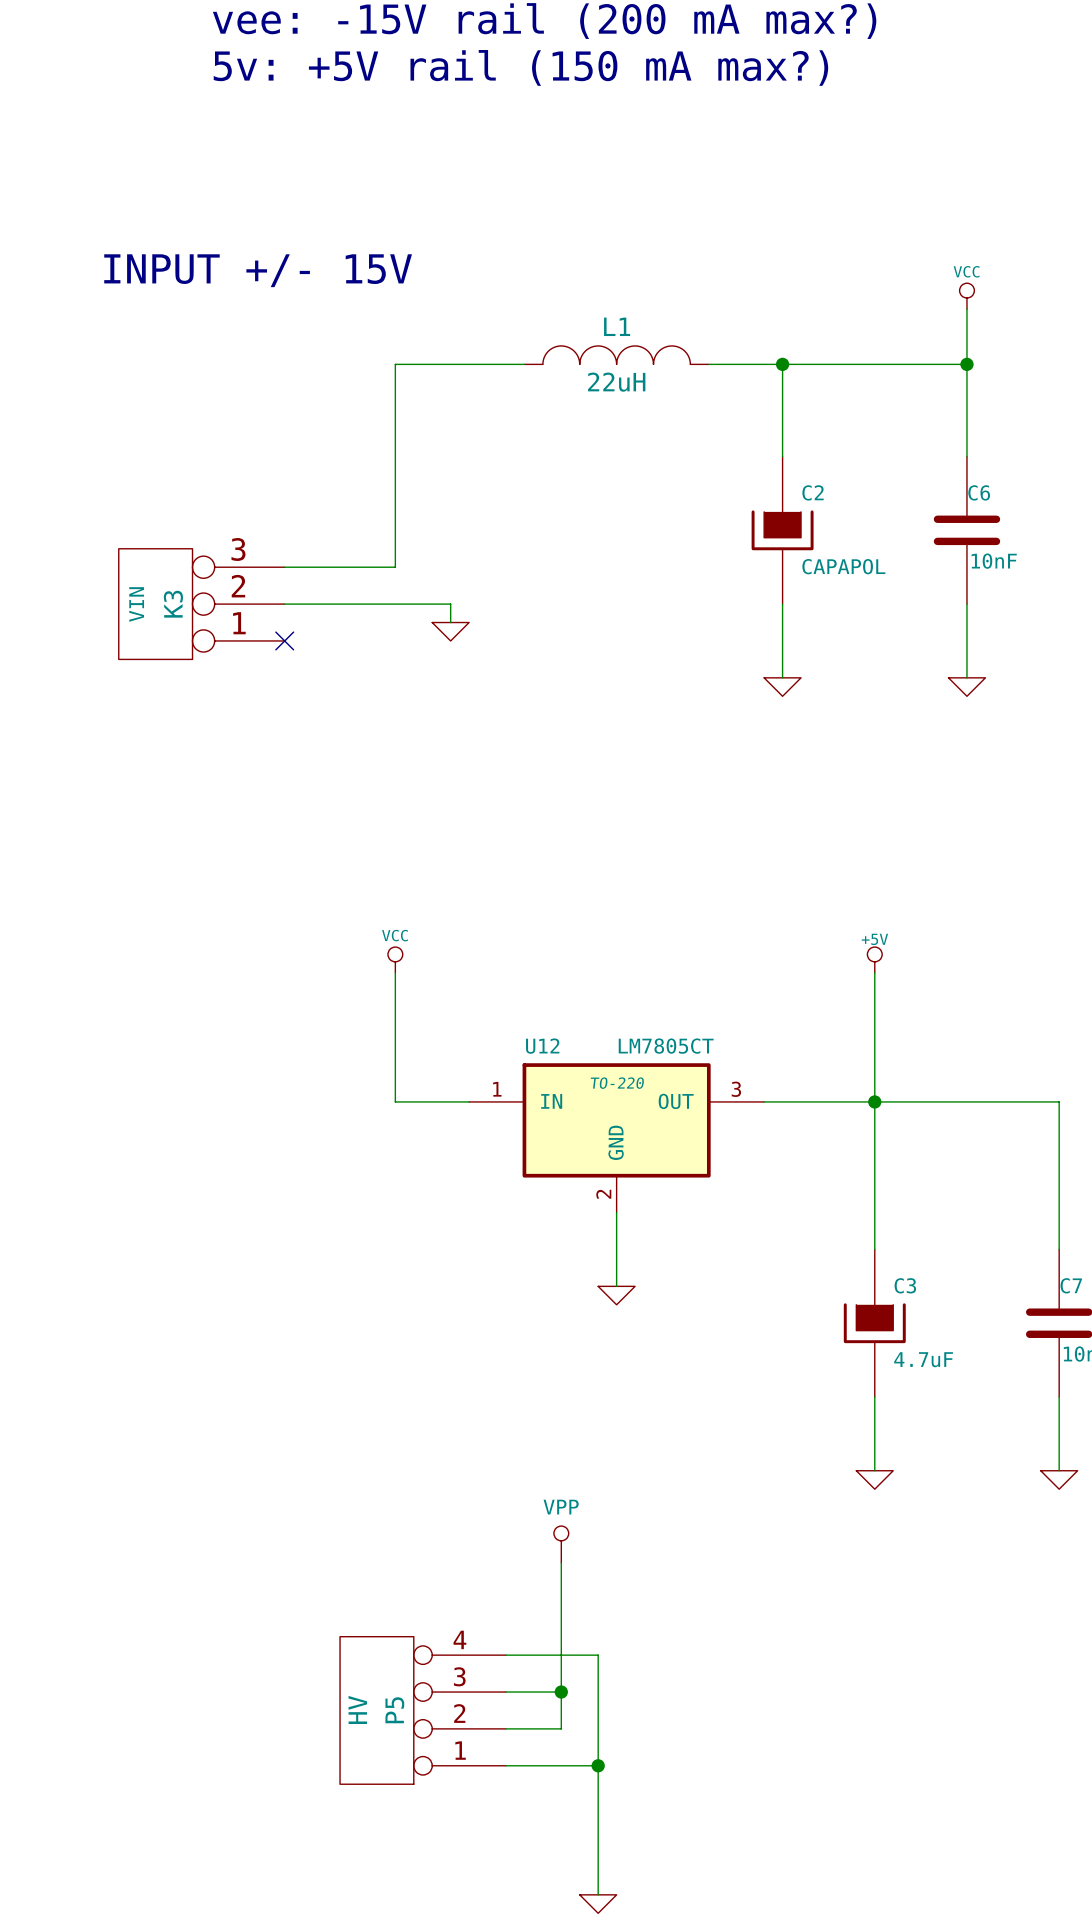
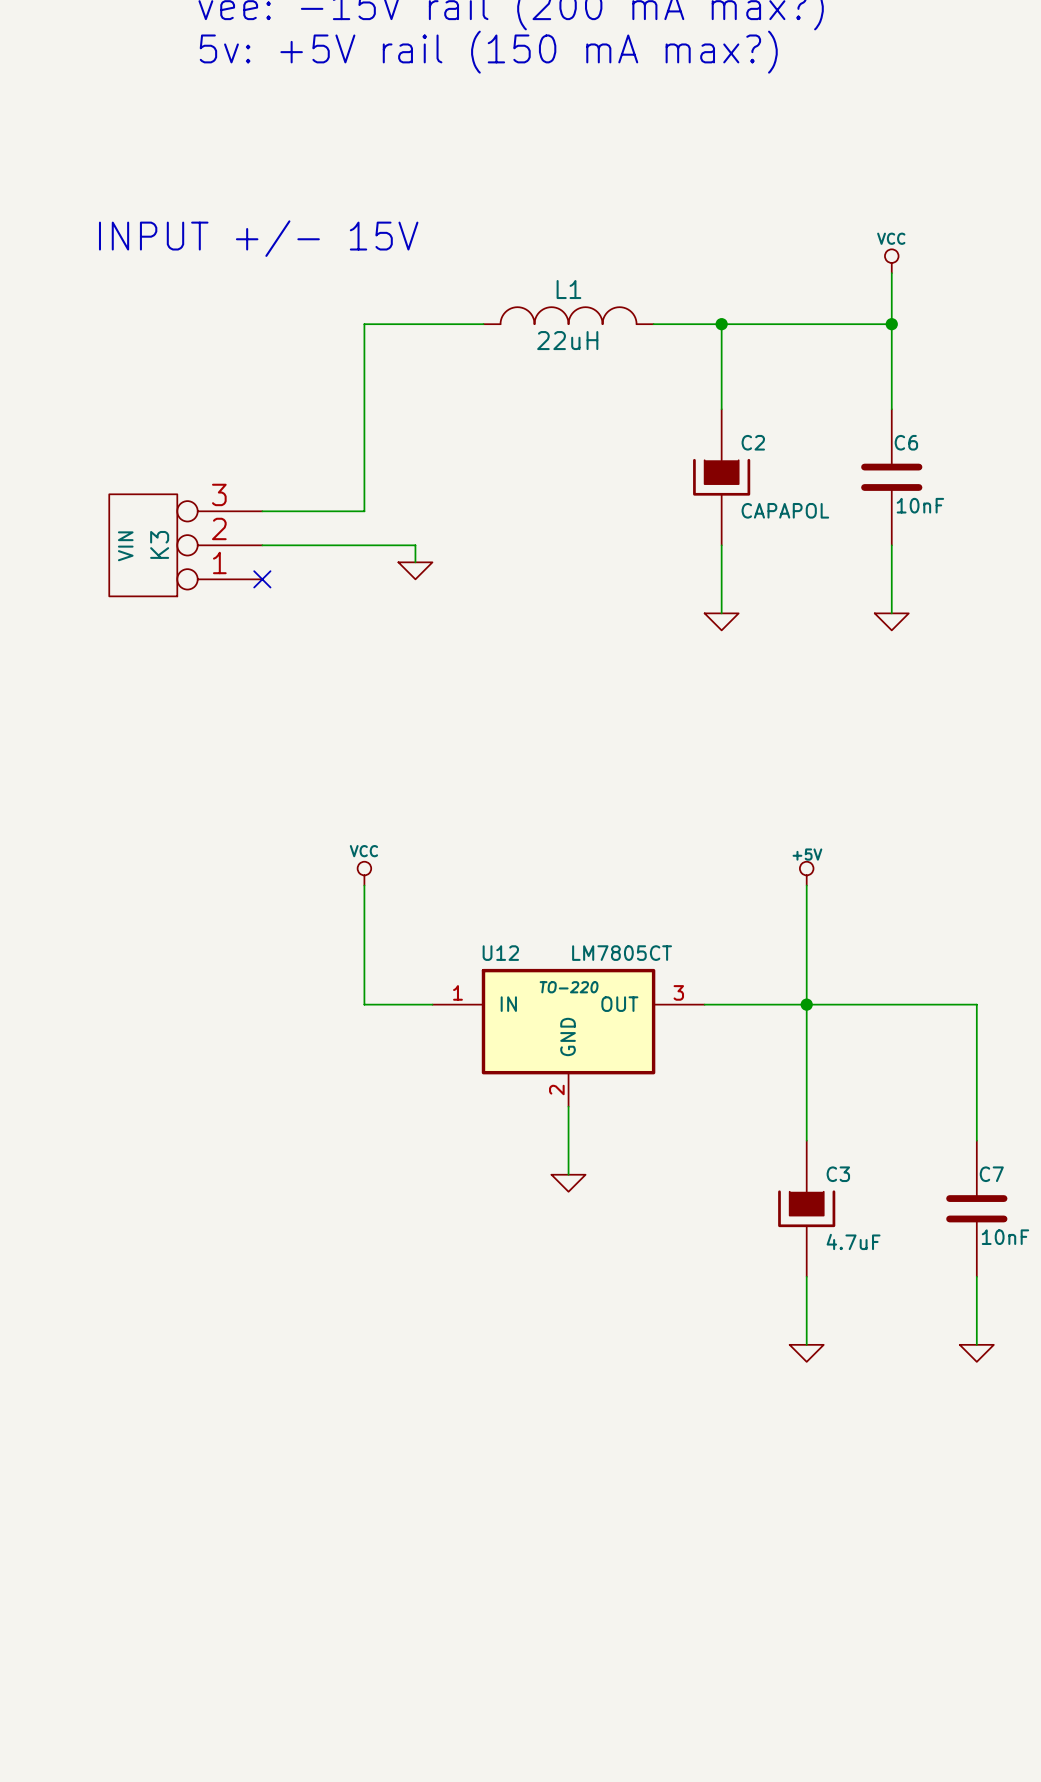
power symbol: VPP (561, 1544) -> none
wire: (561, 1562) (561, 1728) (505, 1728) -> none
wire: (505, 1655) (598, 1655) (598, 1894) -> none
wire: (505, 1692) (561, 1692) -> none
junction: (561, 1692) -> none
P5: HV (423, 1710) -> none
wire: (505, 1765) (598, 1765) -> none
junction: (598, 1765) -> none
power symbol: (598, 1904) -> none

